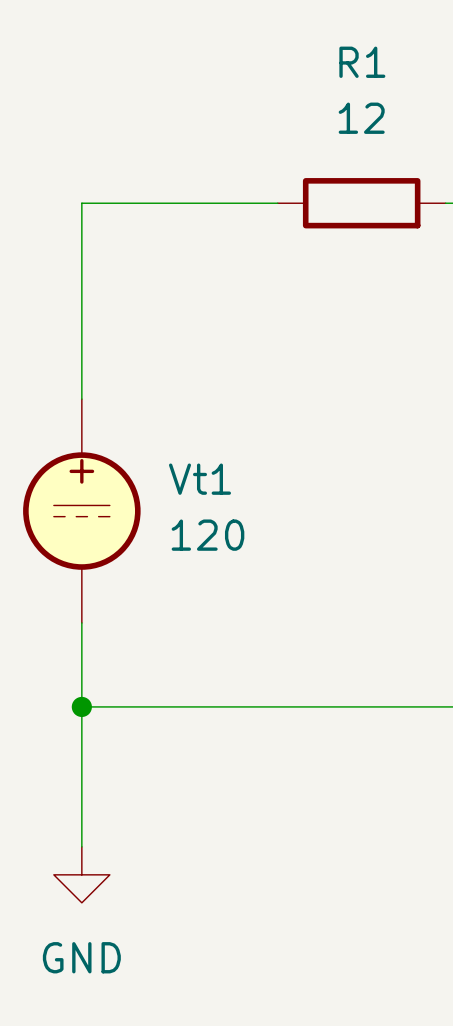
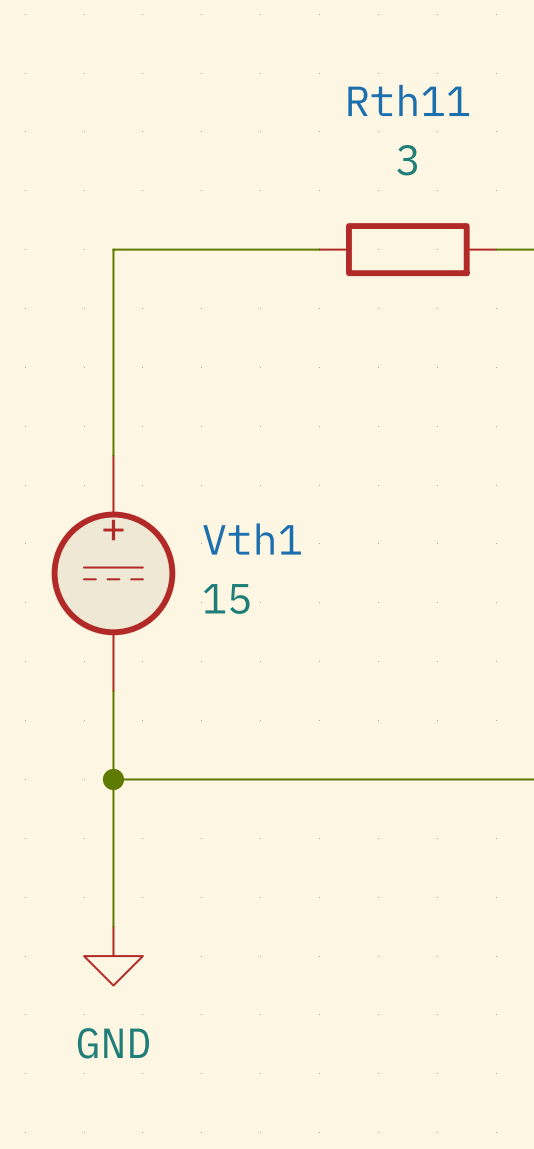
R1 name: R1 (362, 62) -> Rth11 (408, 100)
R1 value: 12 (361, 118) -> 3 (407, 160)
Vt1 name: Vt1 (199, 479) -> Vth1 (252, 538)
Vt1 value: 120 (207, 535) -> 15 (226, 599)

